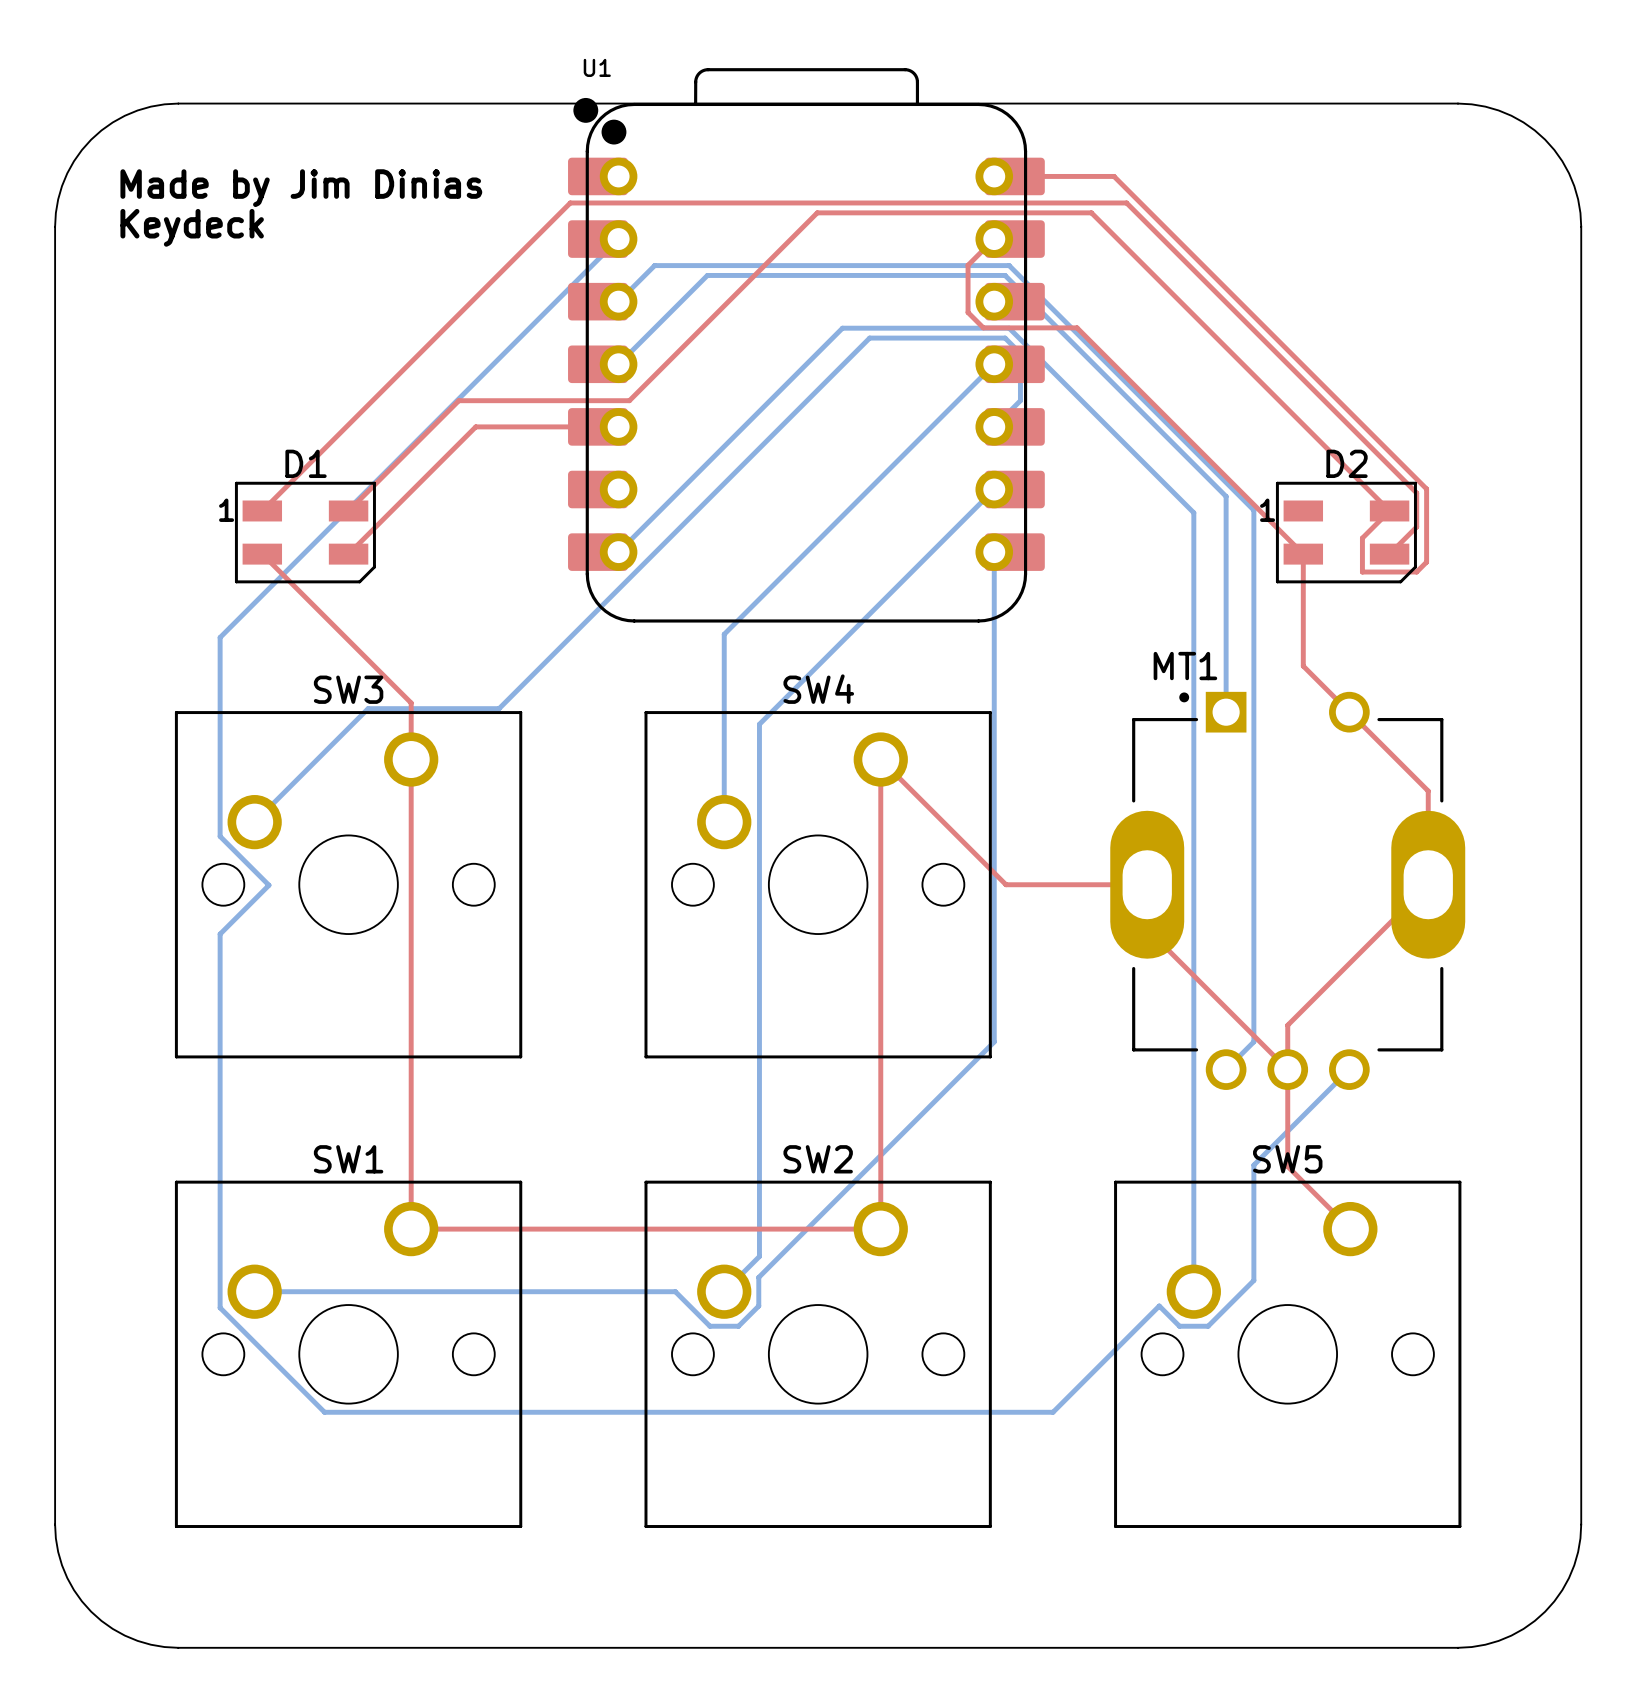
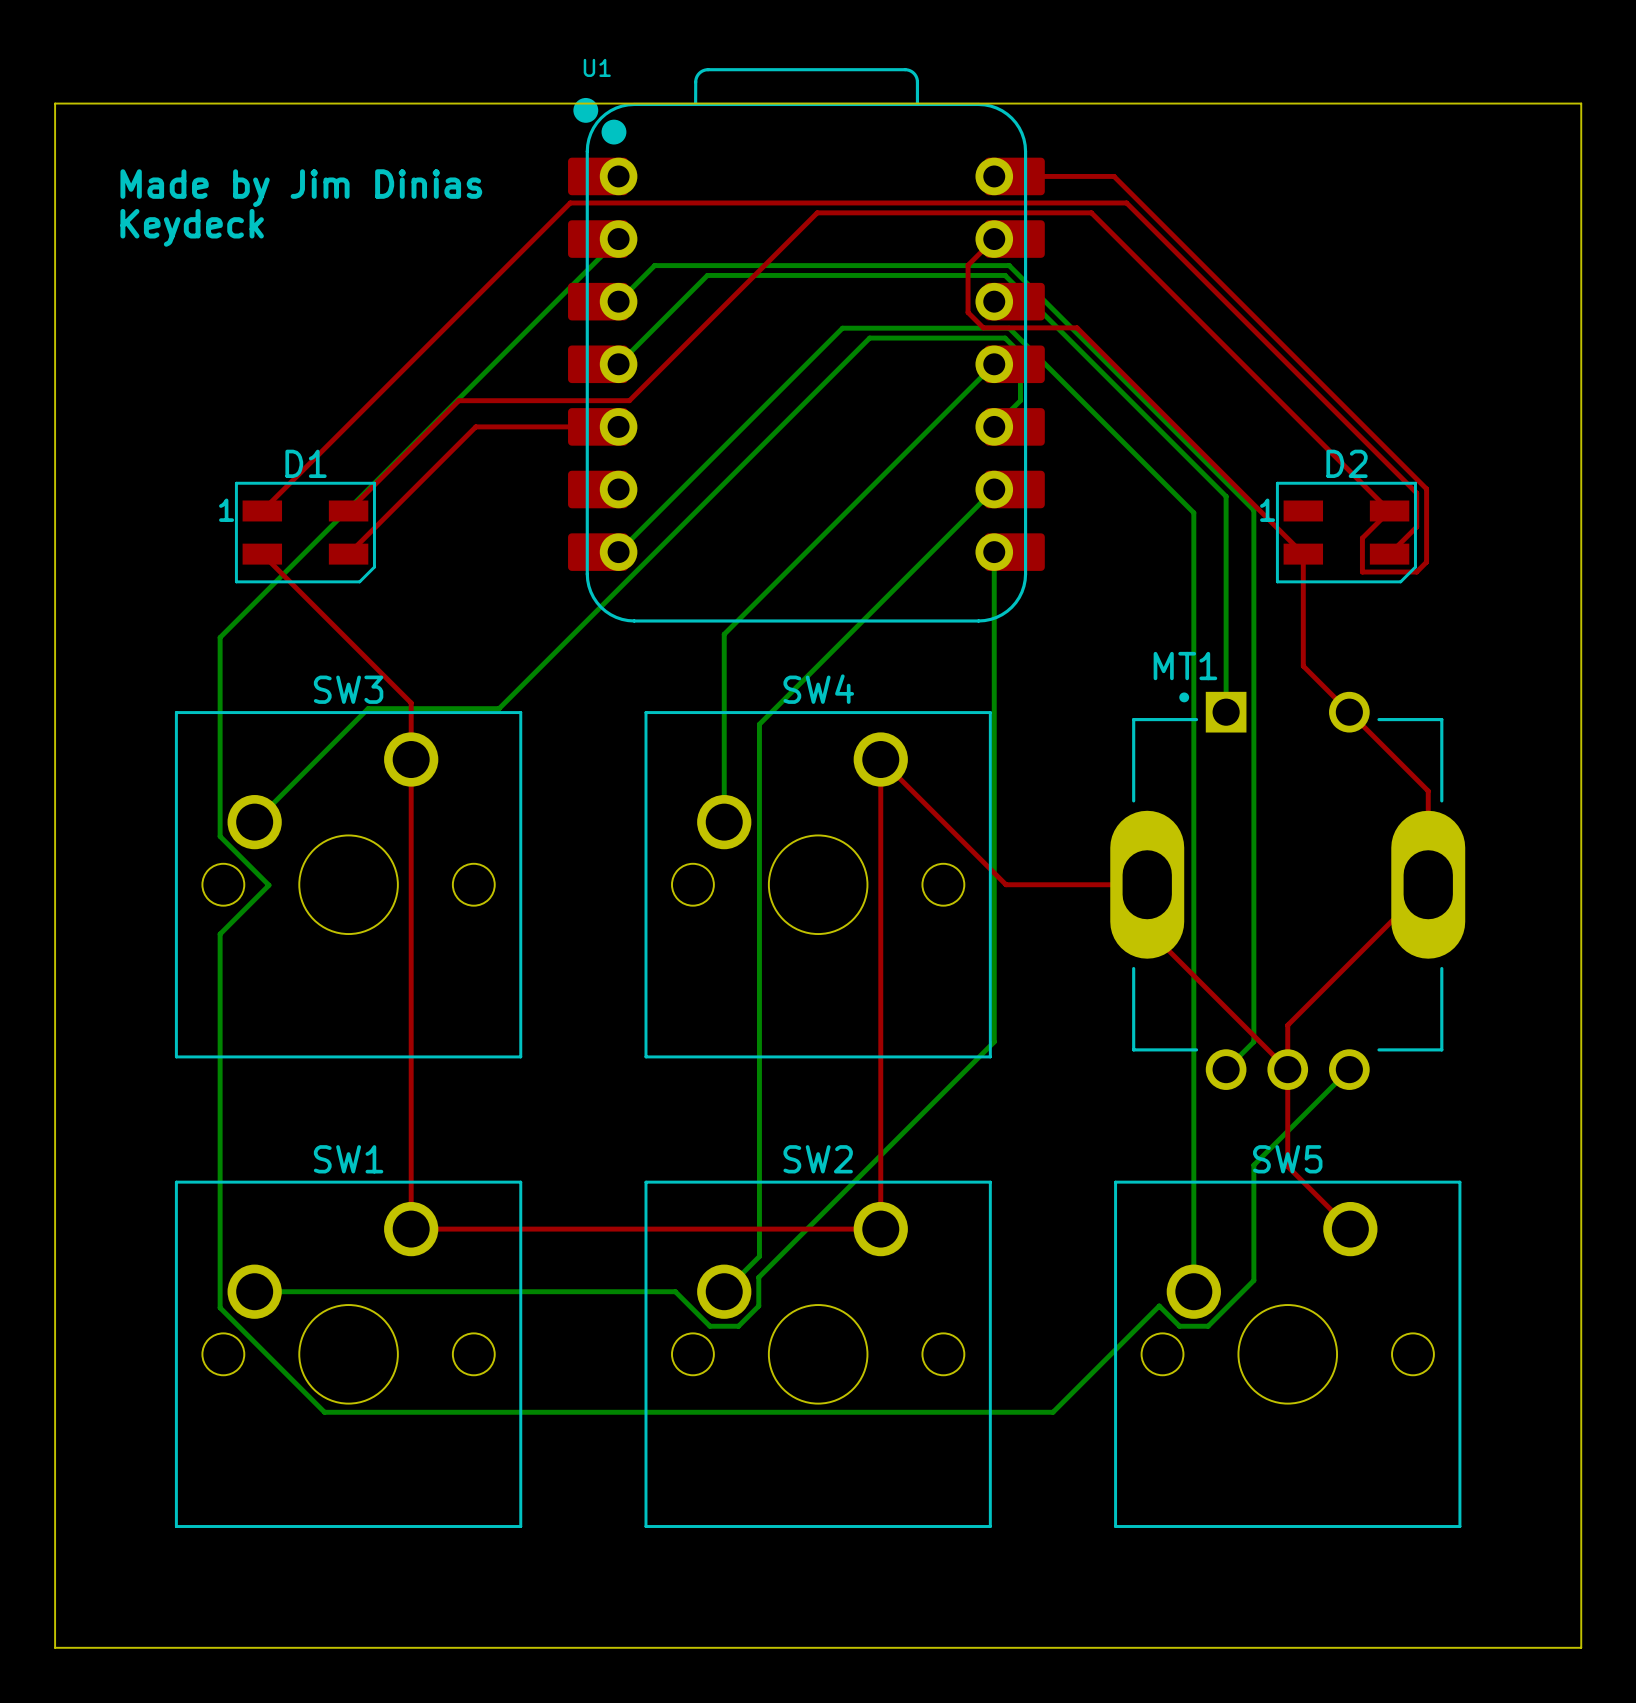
board edge: (178, 103) (164, 104) (137, 110) (112, 122) (91, 139) (73, 161) (67, 173) (58, 199) (55, 226) -> (178, 103) (55, 103) (55, 226)
board edge: (1457, 103) (1471, 104) (1498, 110) (1523, 122) (1545, 139) (1562, 161) (1569, 173) (1578, 199) (1581, 226) -> (1457, 103) (1581, 103) (1581, 226)
board edge: (55, 1524) (55, 1538) (62, 1565) (73, 1590) (91, 1611) (112, 1628) (124, 1635) (150, 1644) (178, 1647) -> (55, 1524) (55, 1647) (178, 1647)
board edge: (1581, 1524) (1578, 1551) (1574, 1565) (1562, 1590) (1545, 1611) (1523, 1628) (1511, 1635) (1485, 1644) (1457, 1647) -> (1581, 1524) (1581, 1647) (1457, 1647)

